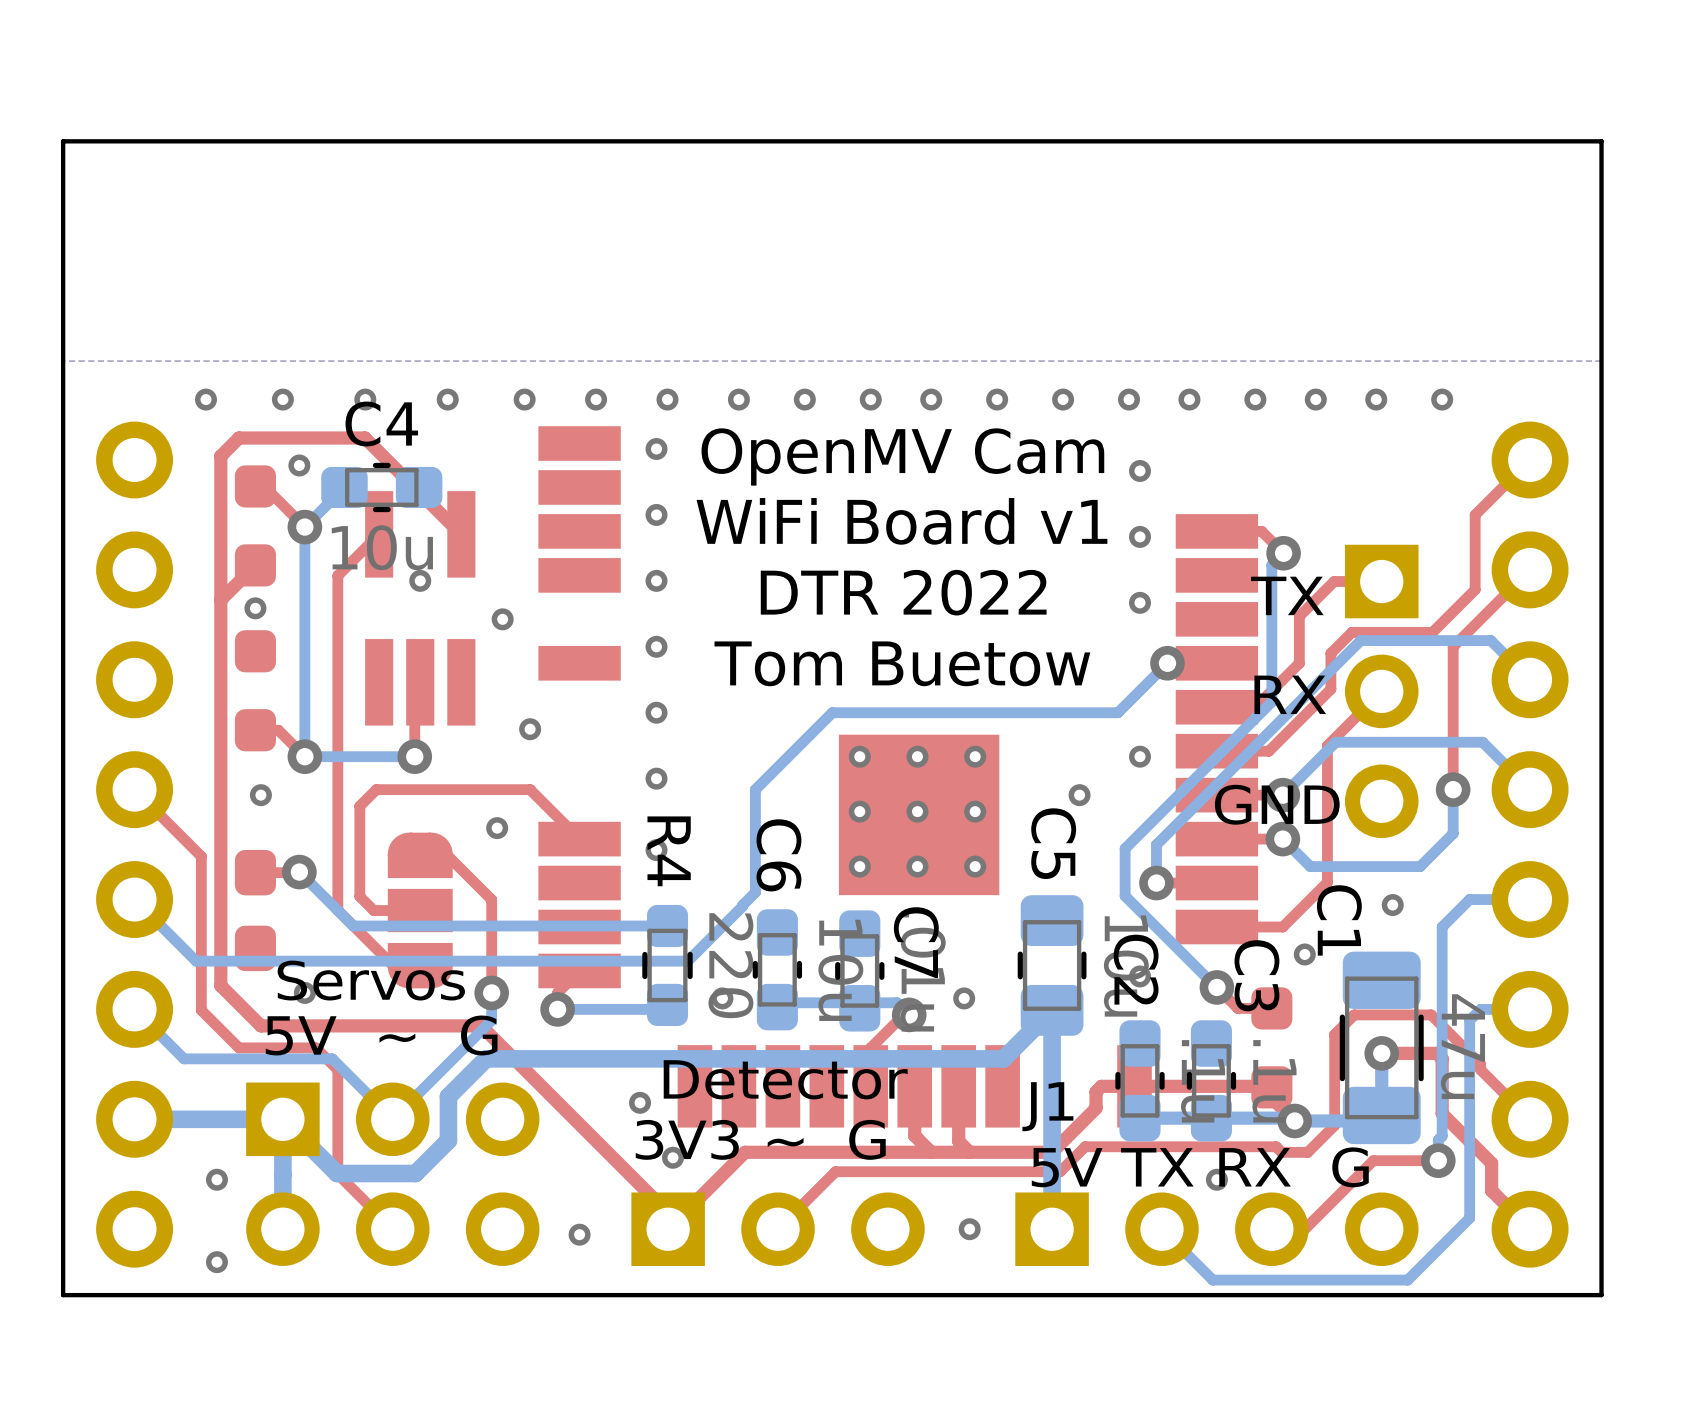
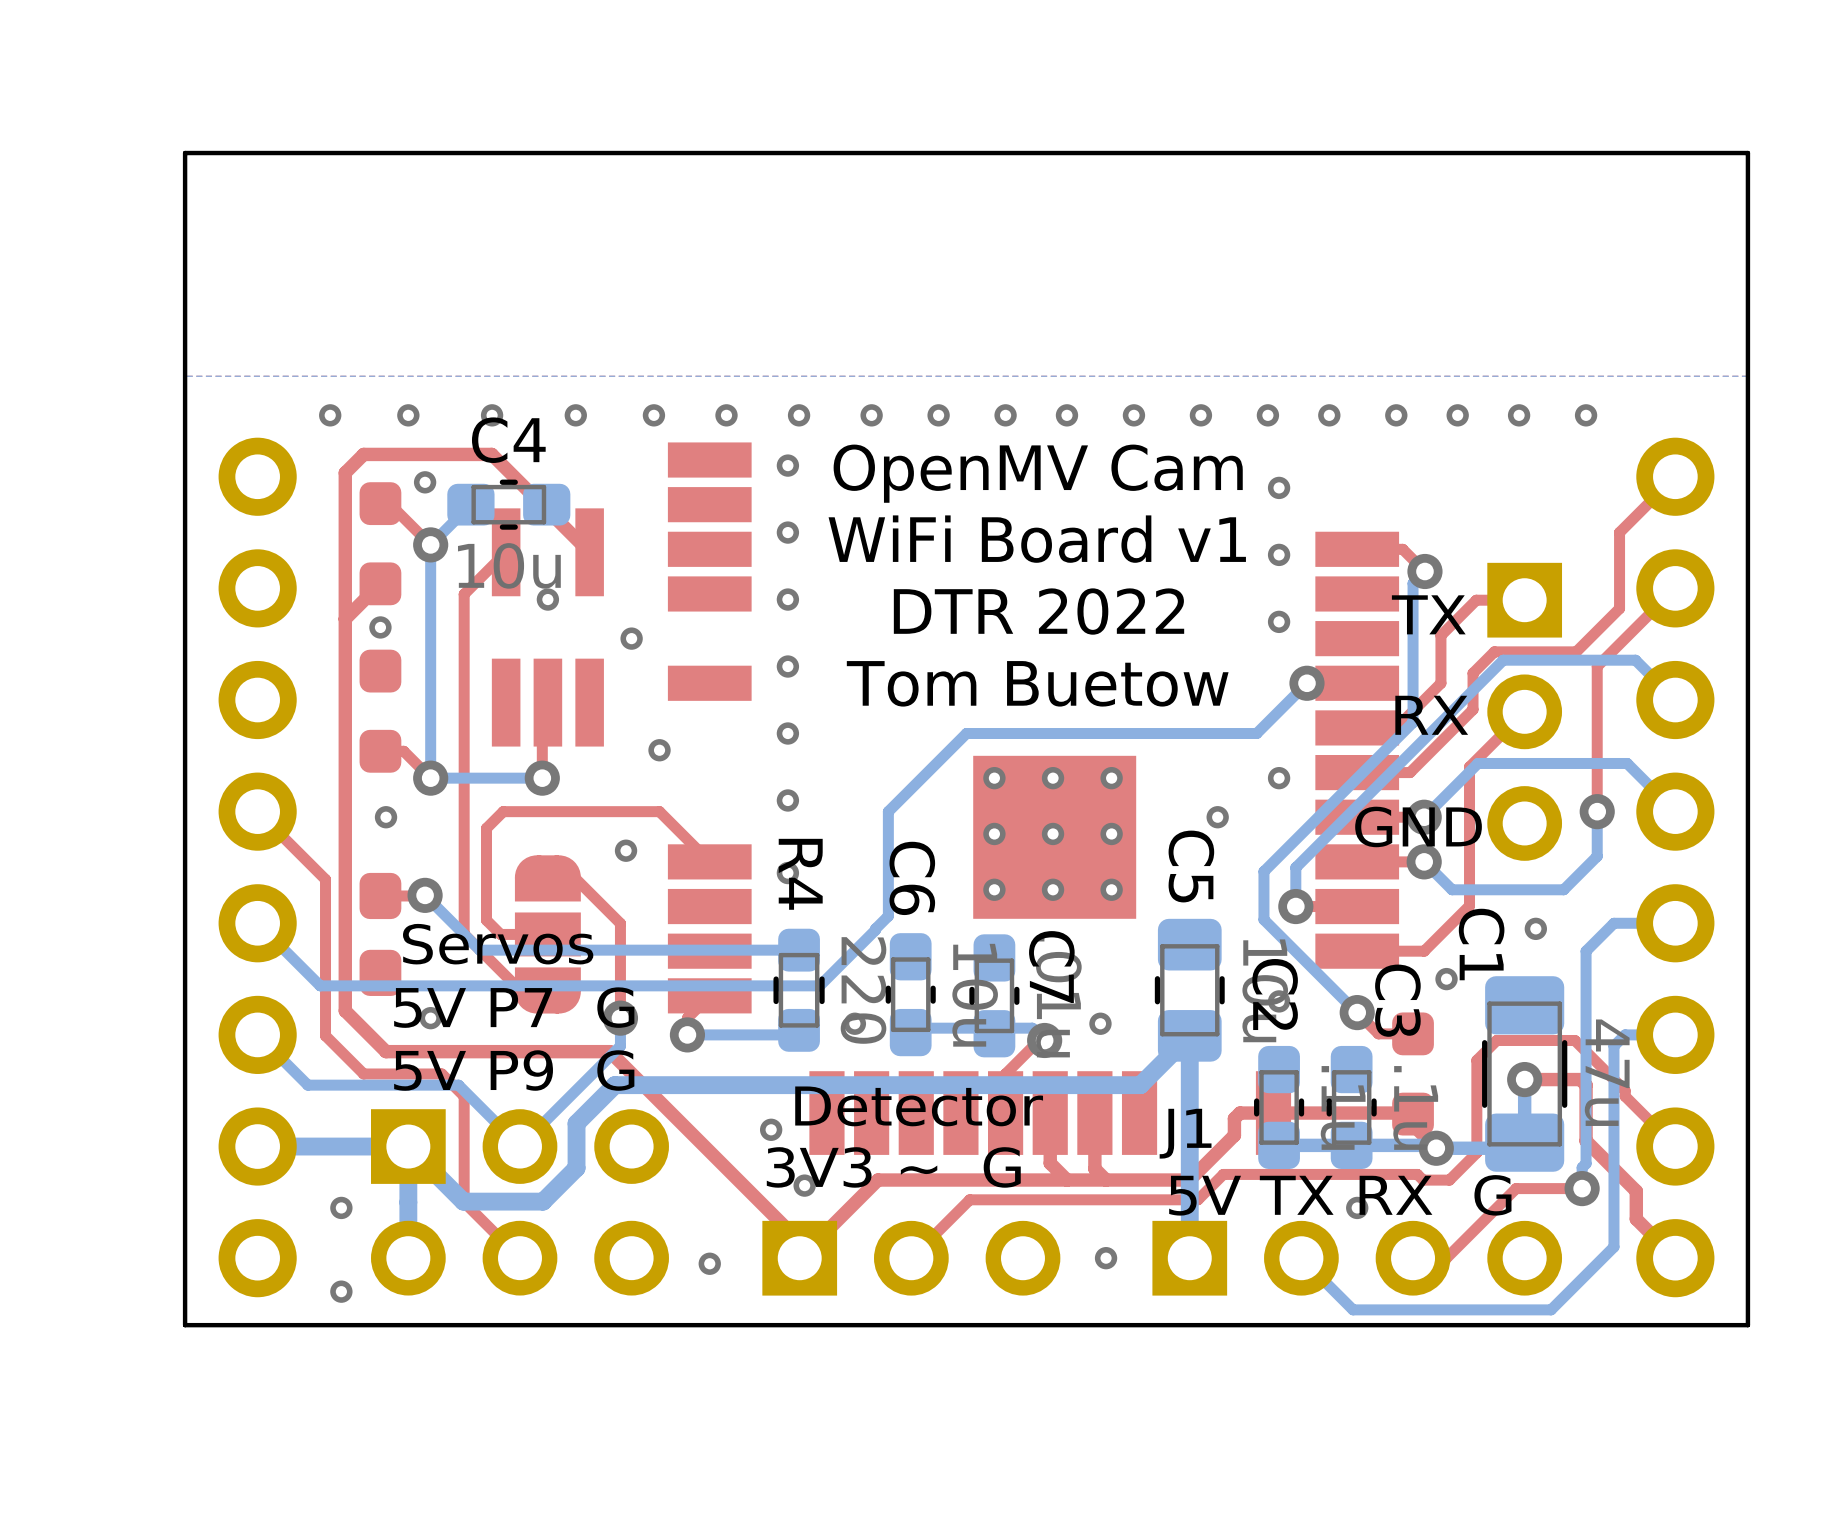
text: none -> Servos (498, 944)
text: Servos (371, 980) -> 5V P7 G (514, 1007)
text: 5V ~ G (381, 1035) -> 5V P9 G (514, 1070)

